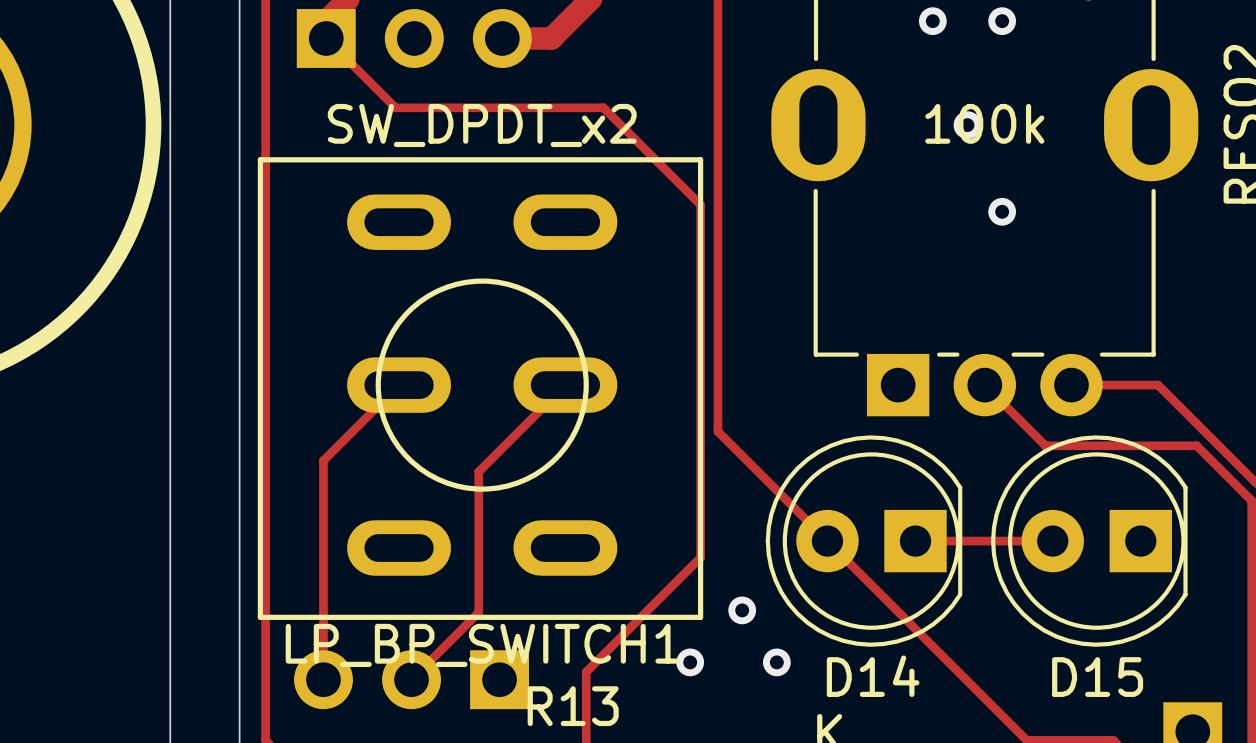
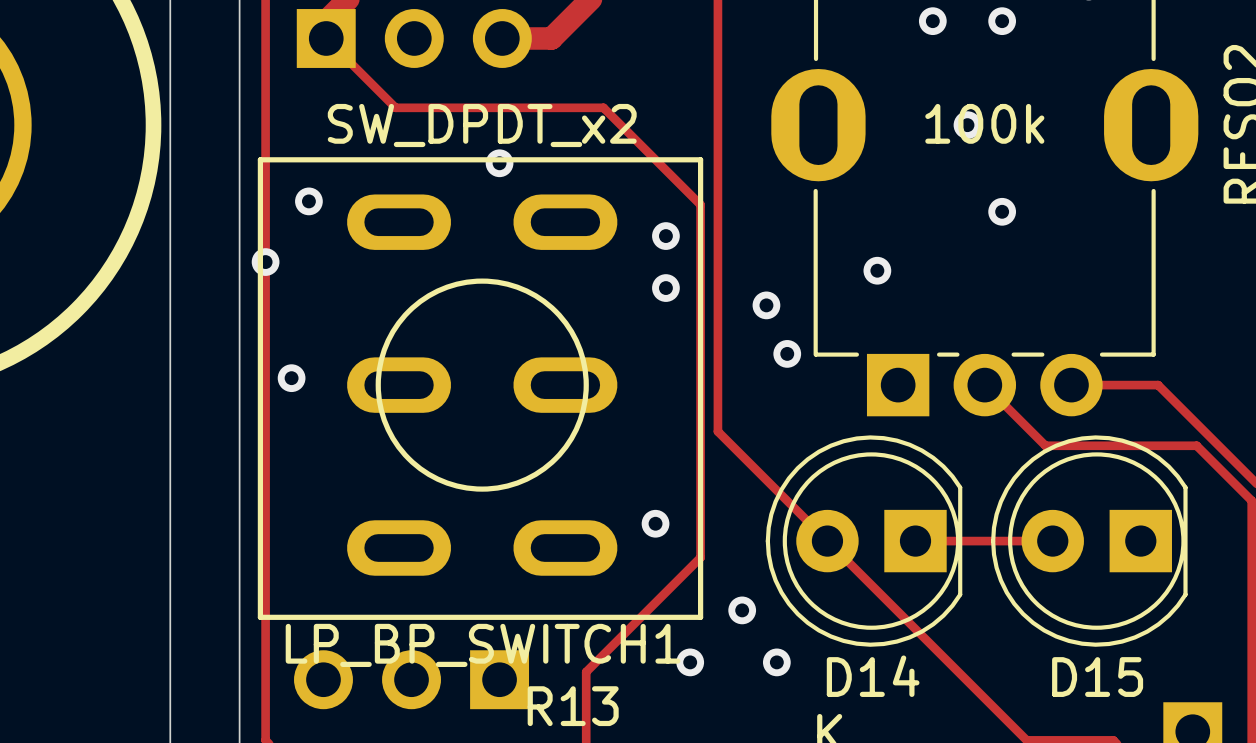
via: none -> (499, 163)
via: none -> (308, 201)
via: none -> (665, 236)
via: none -> (265, 262)
via: none -> (877, 270)
via: none -> (665, 288)
via: none -> (766, 305)
via: none -> (787, 353)
via: none -> (291, 378)
track: (399, 385) (323, 460) (323, 679) -> none
track: (565, 385) (478, 471) (478, 612) (411, 679) -> none
via: none -> (655, 523)

